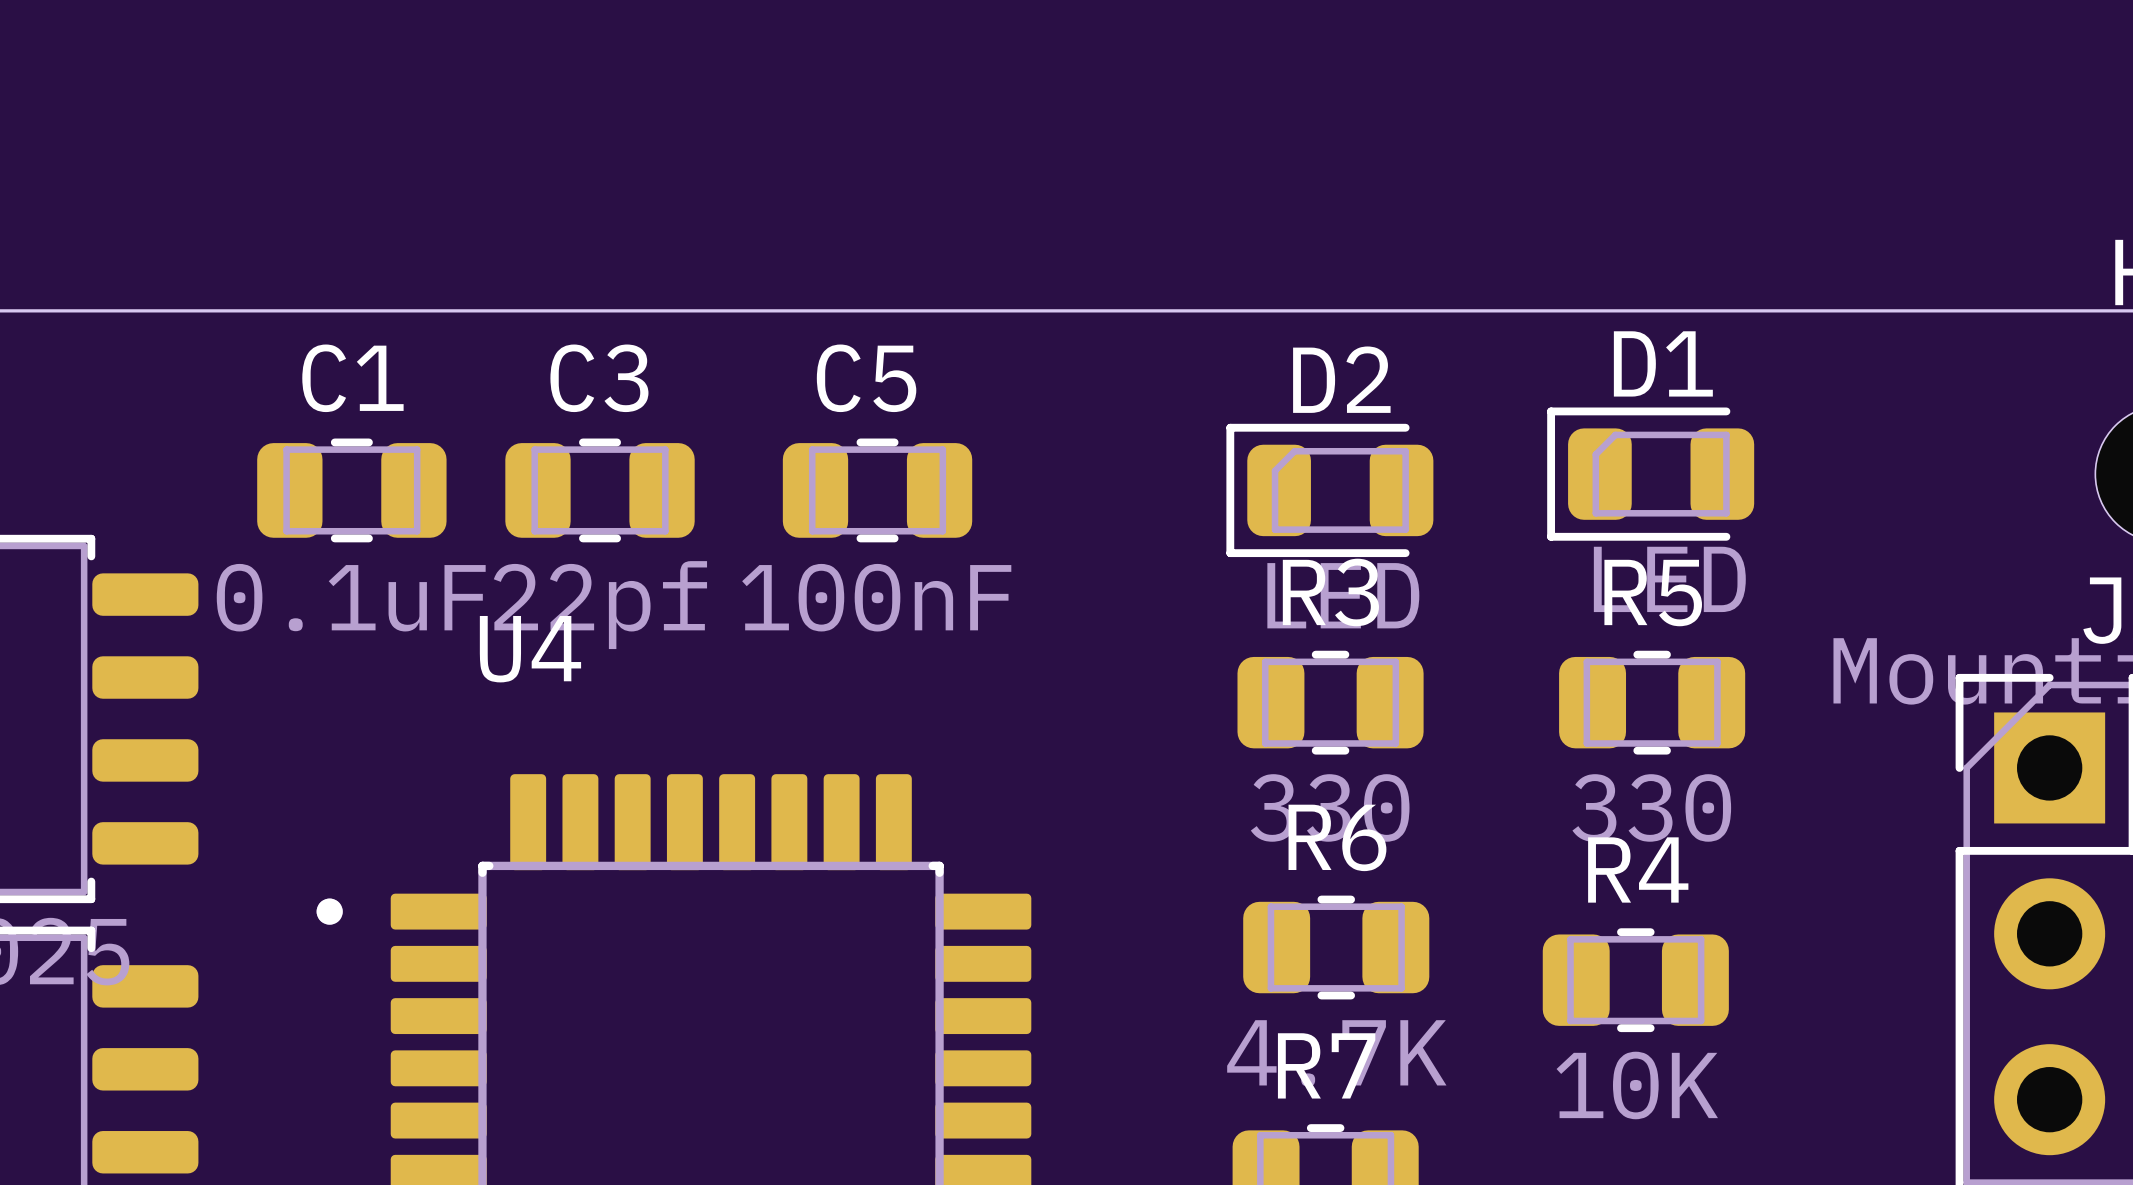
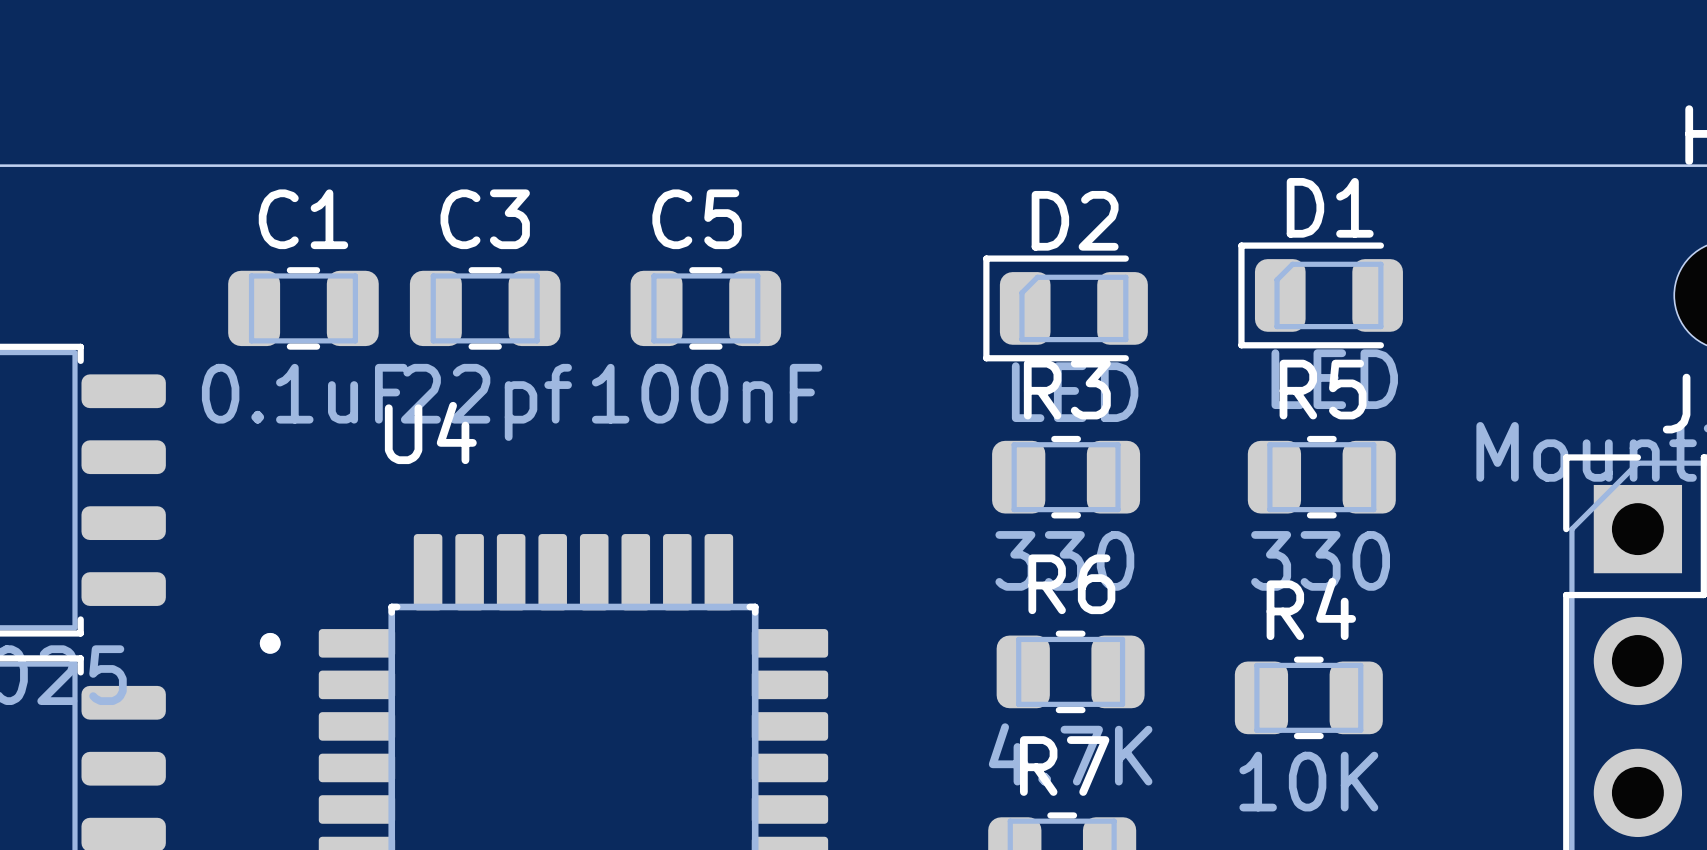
C1 position: (351, 490) -> (303, 308)

